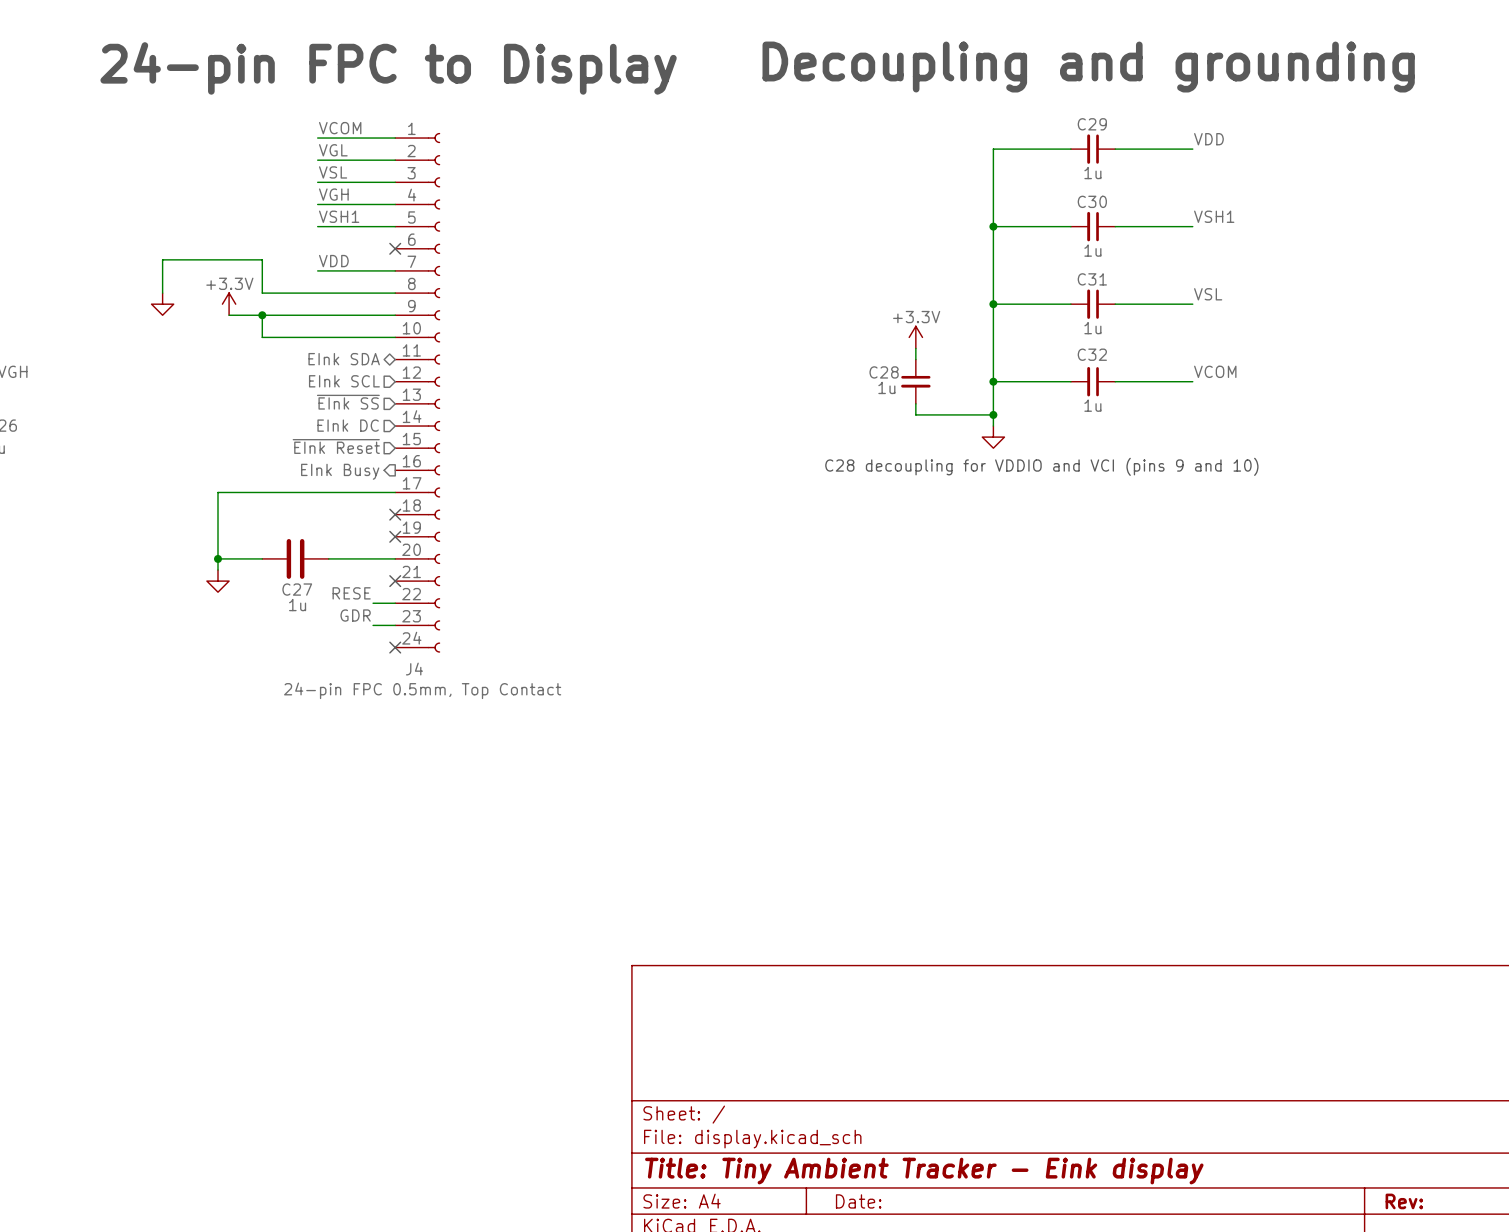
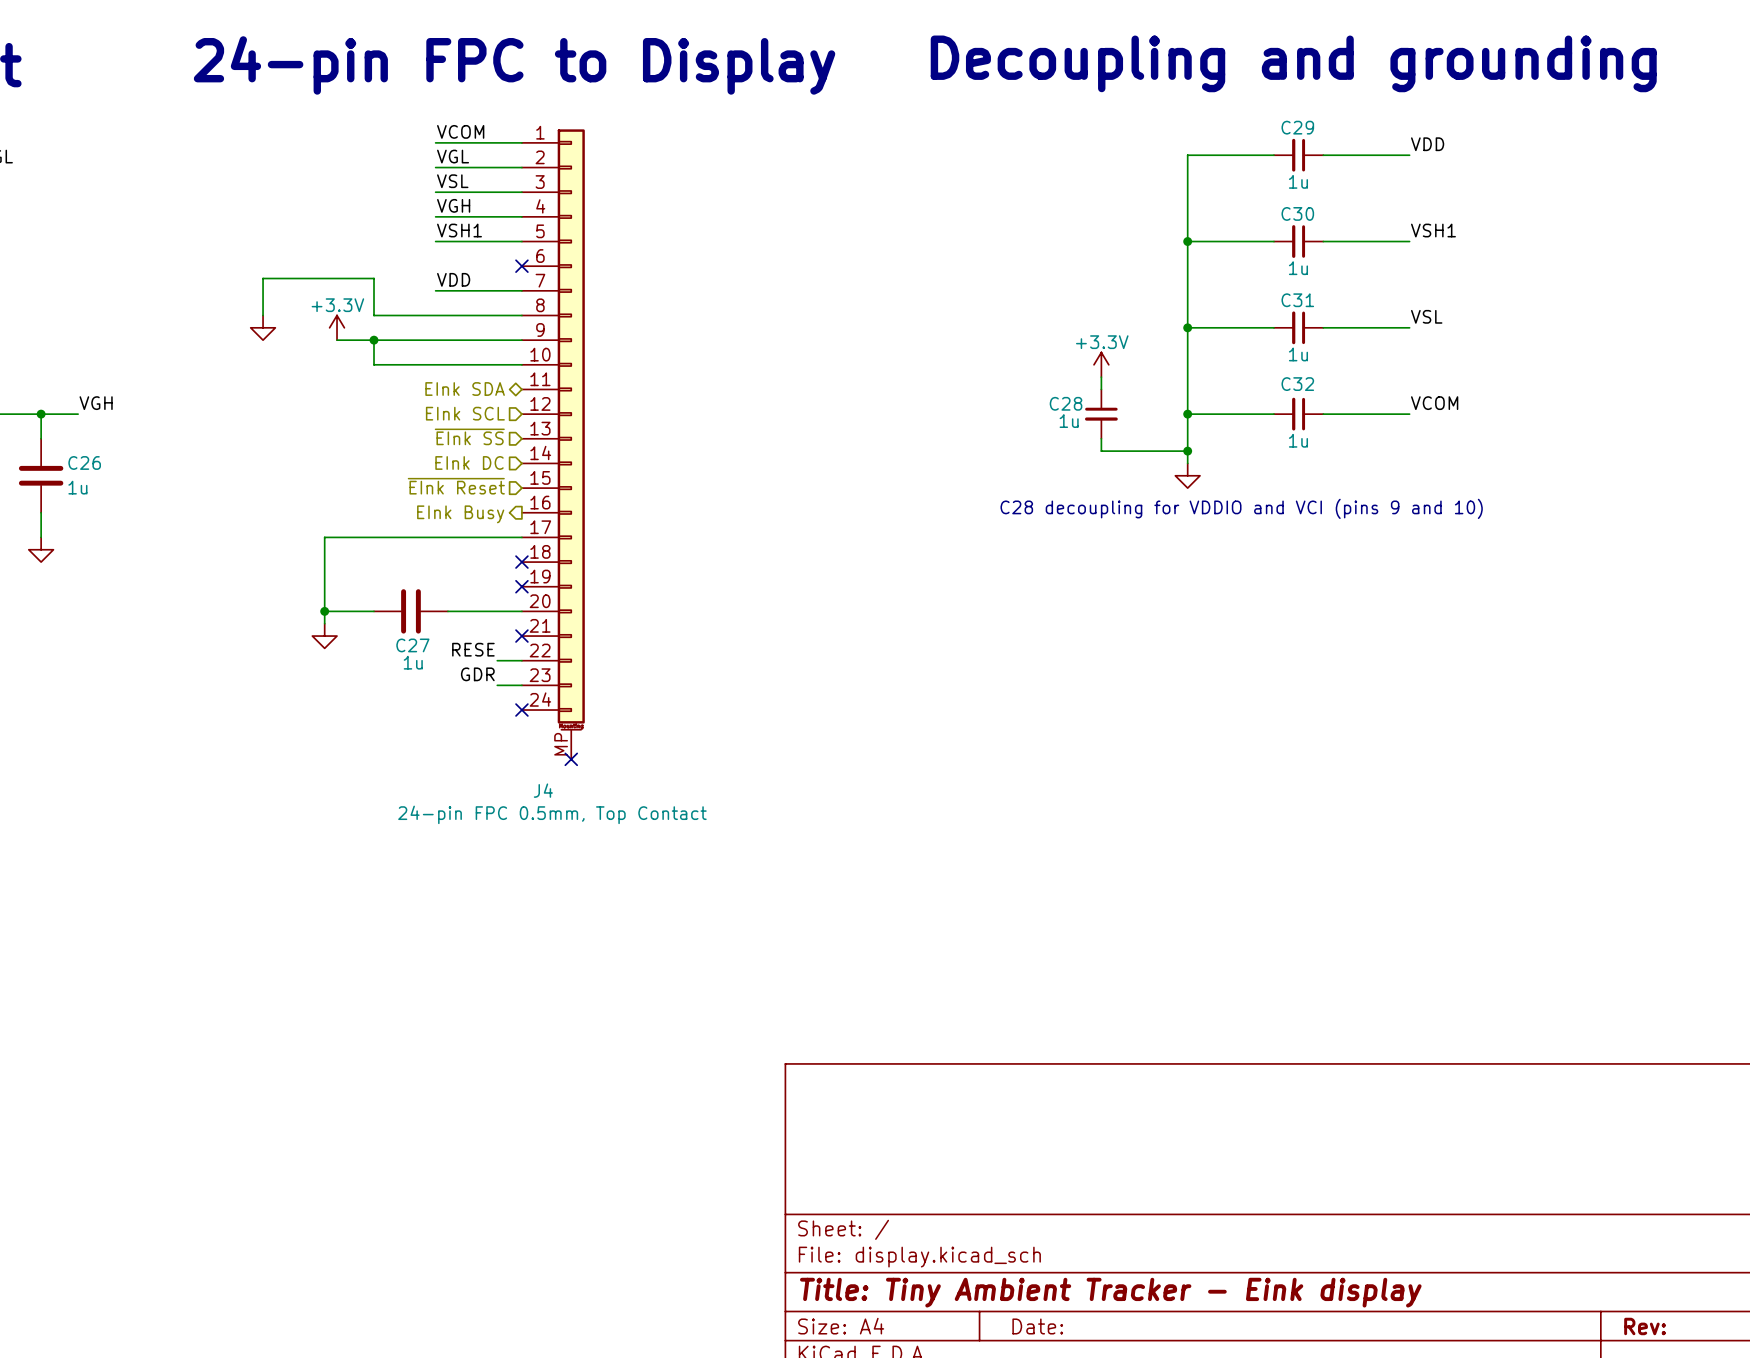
J4 symbol: [395, 132, 441, 653] -> [521, 129, 585, 760]
J4 name position: J4 (414, 669) -> J4 (543, 790)
J4 value position: 24-pin FPC 0.5mm, Top Contact (422, 690) -> 24-pin FPC 0.5mm, Top Contact (552, 814)
no-connect mark: none -> (571, 759)

